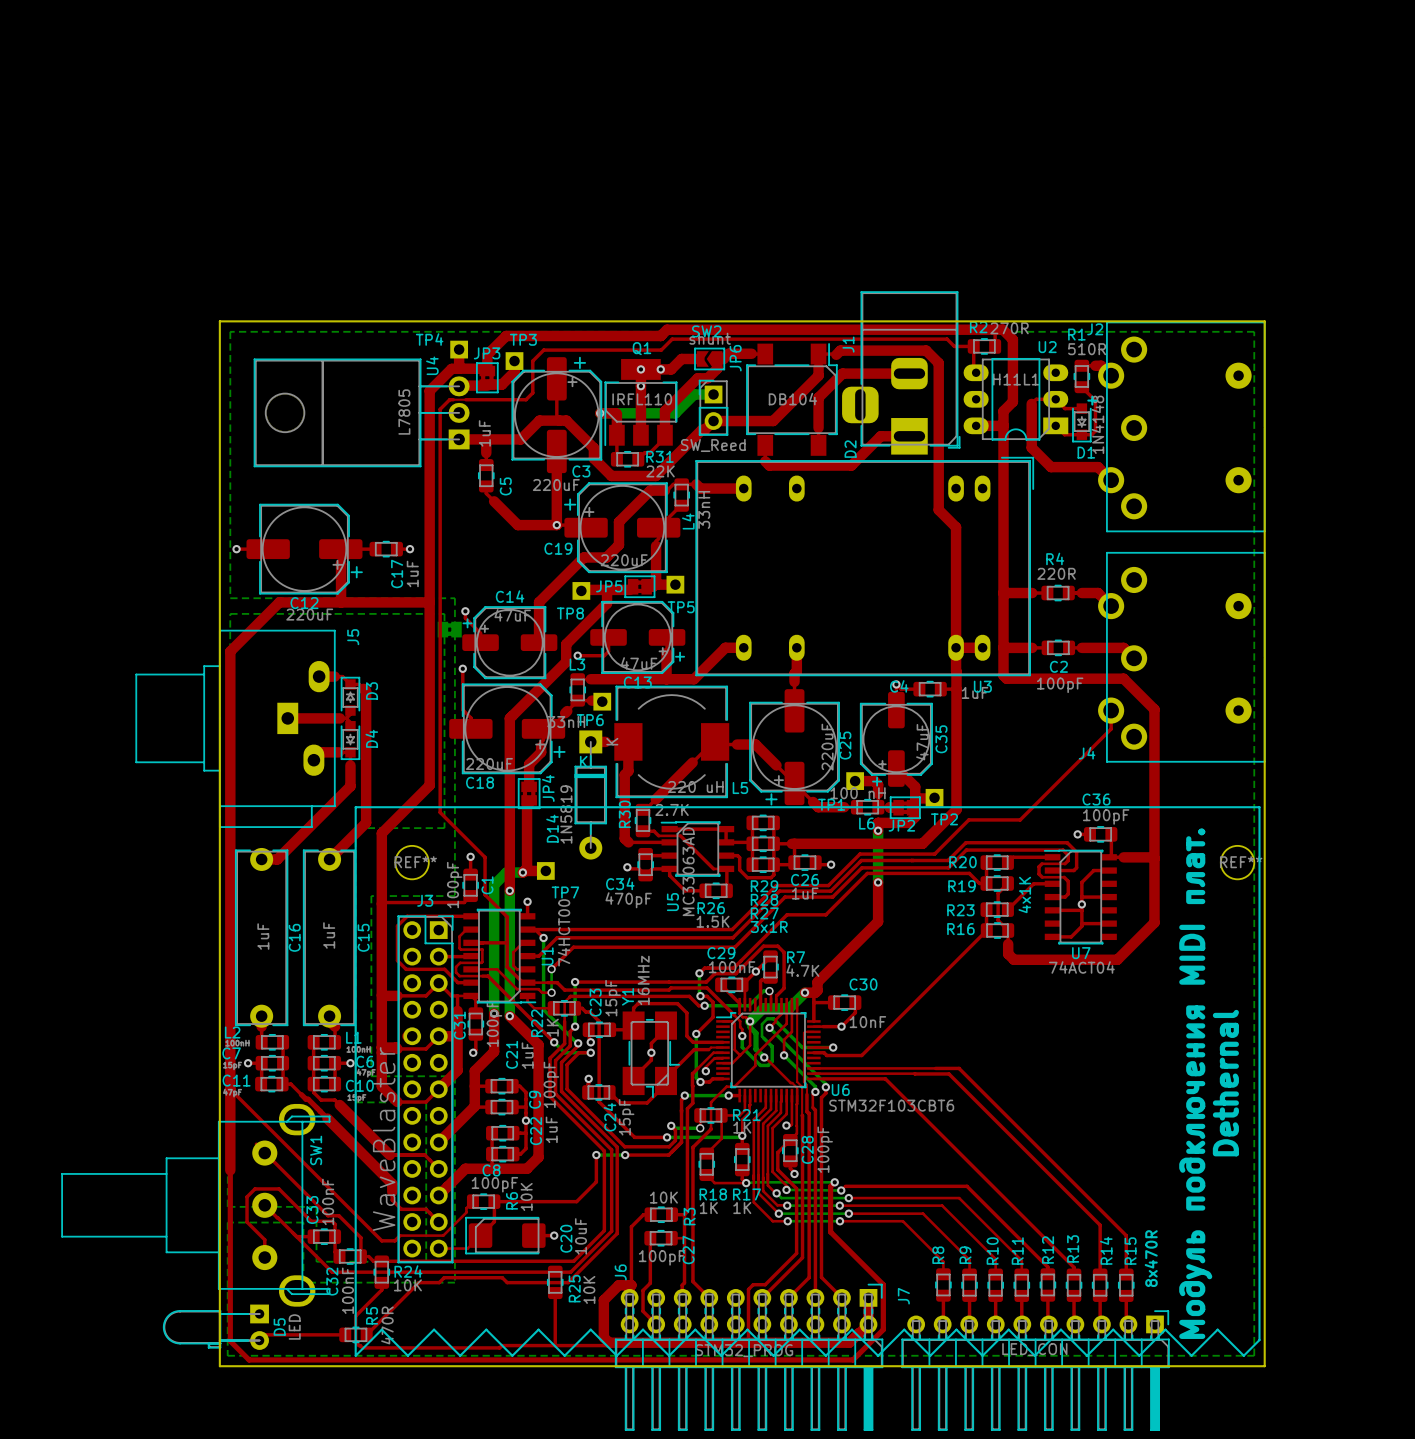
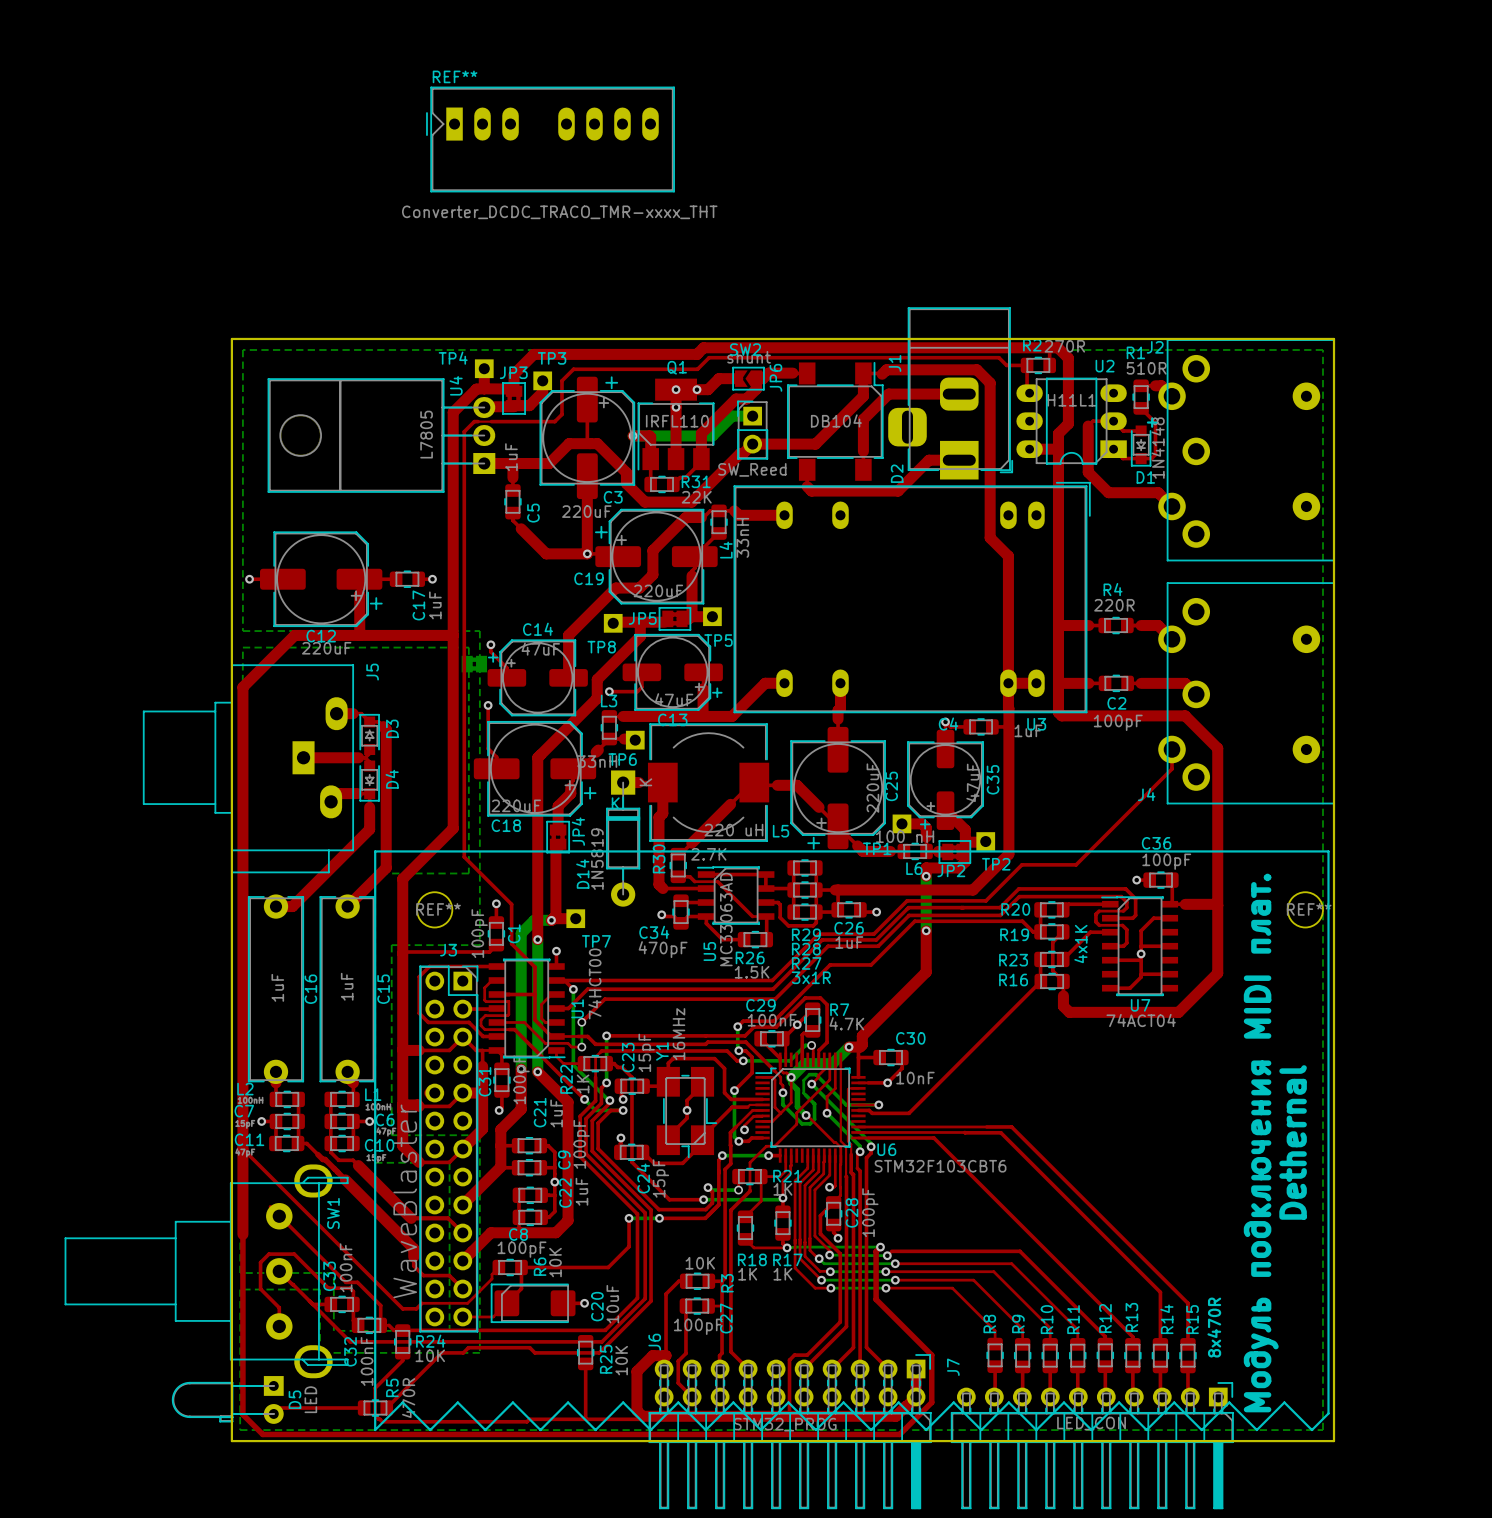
REF**: none -> Converter_DCDC_TRACO_TMR-xxxx_THT (550, 139)

